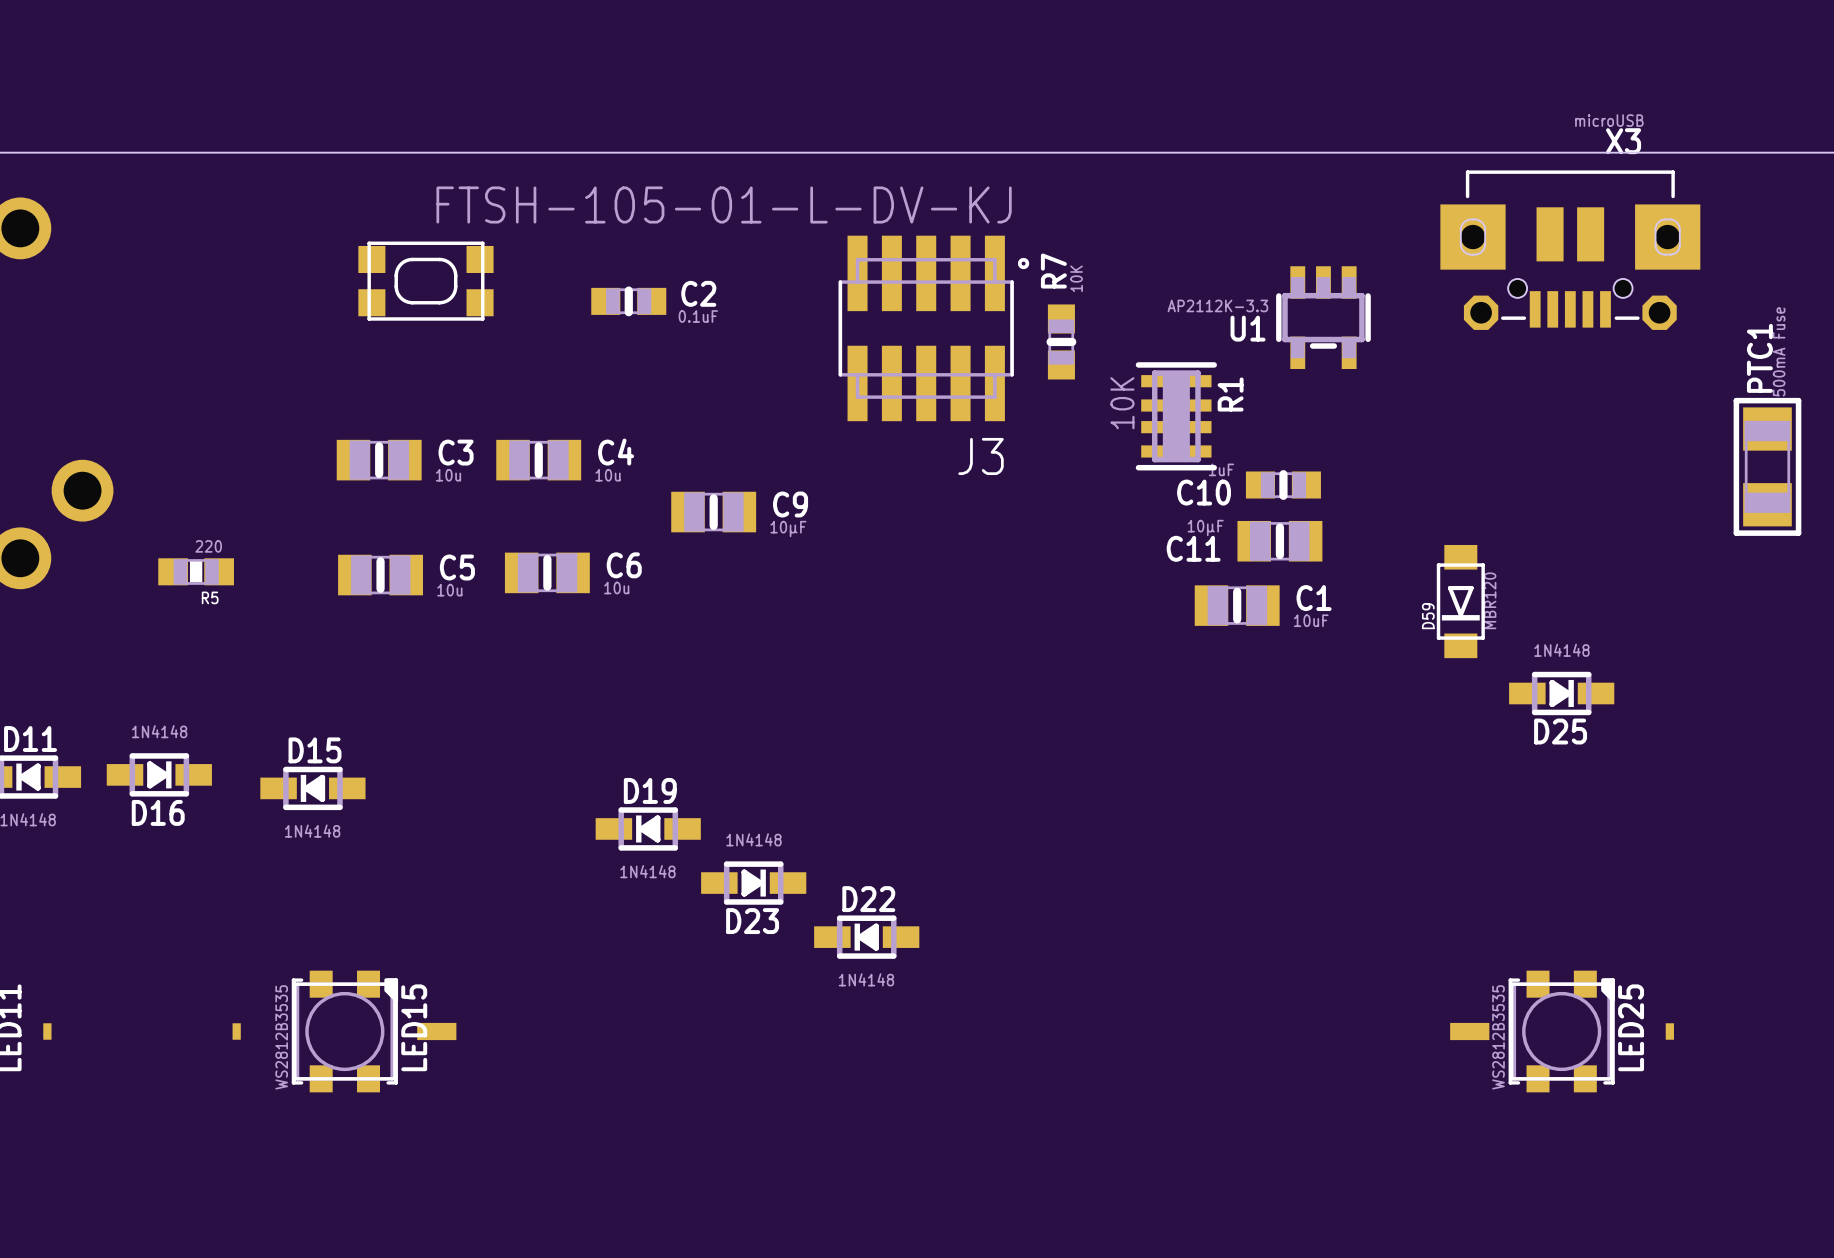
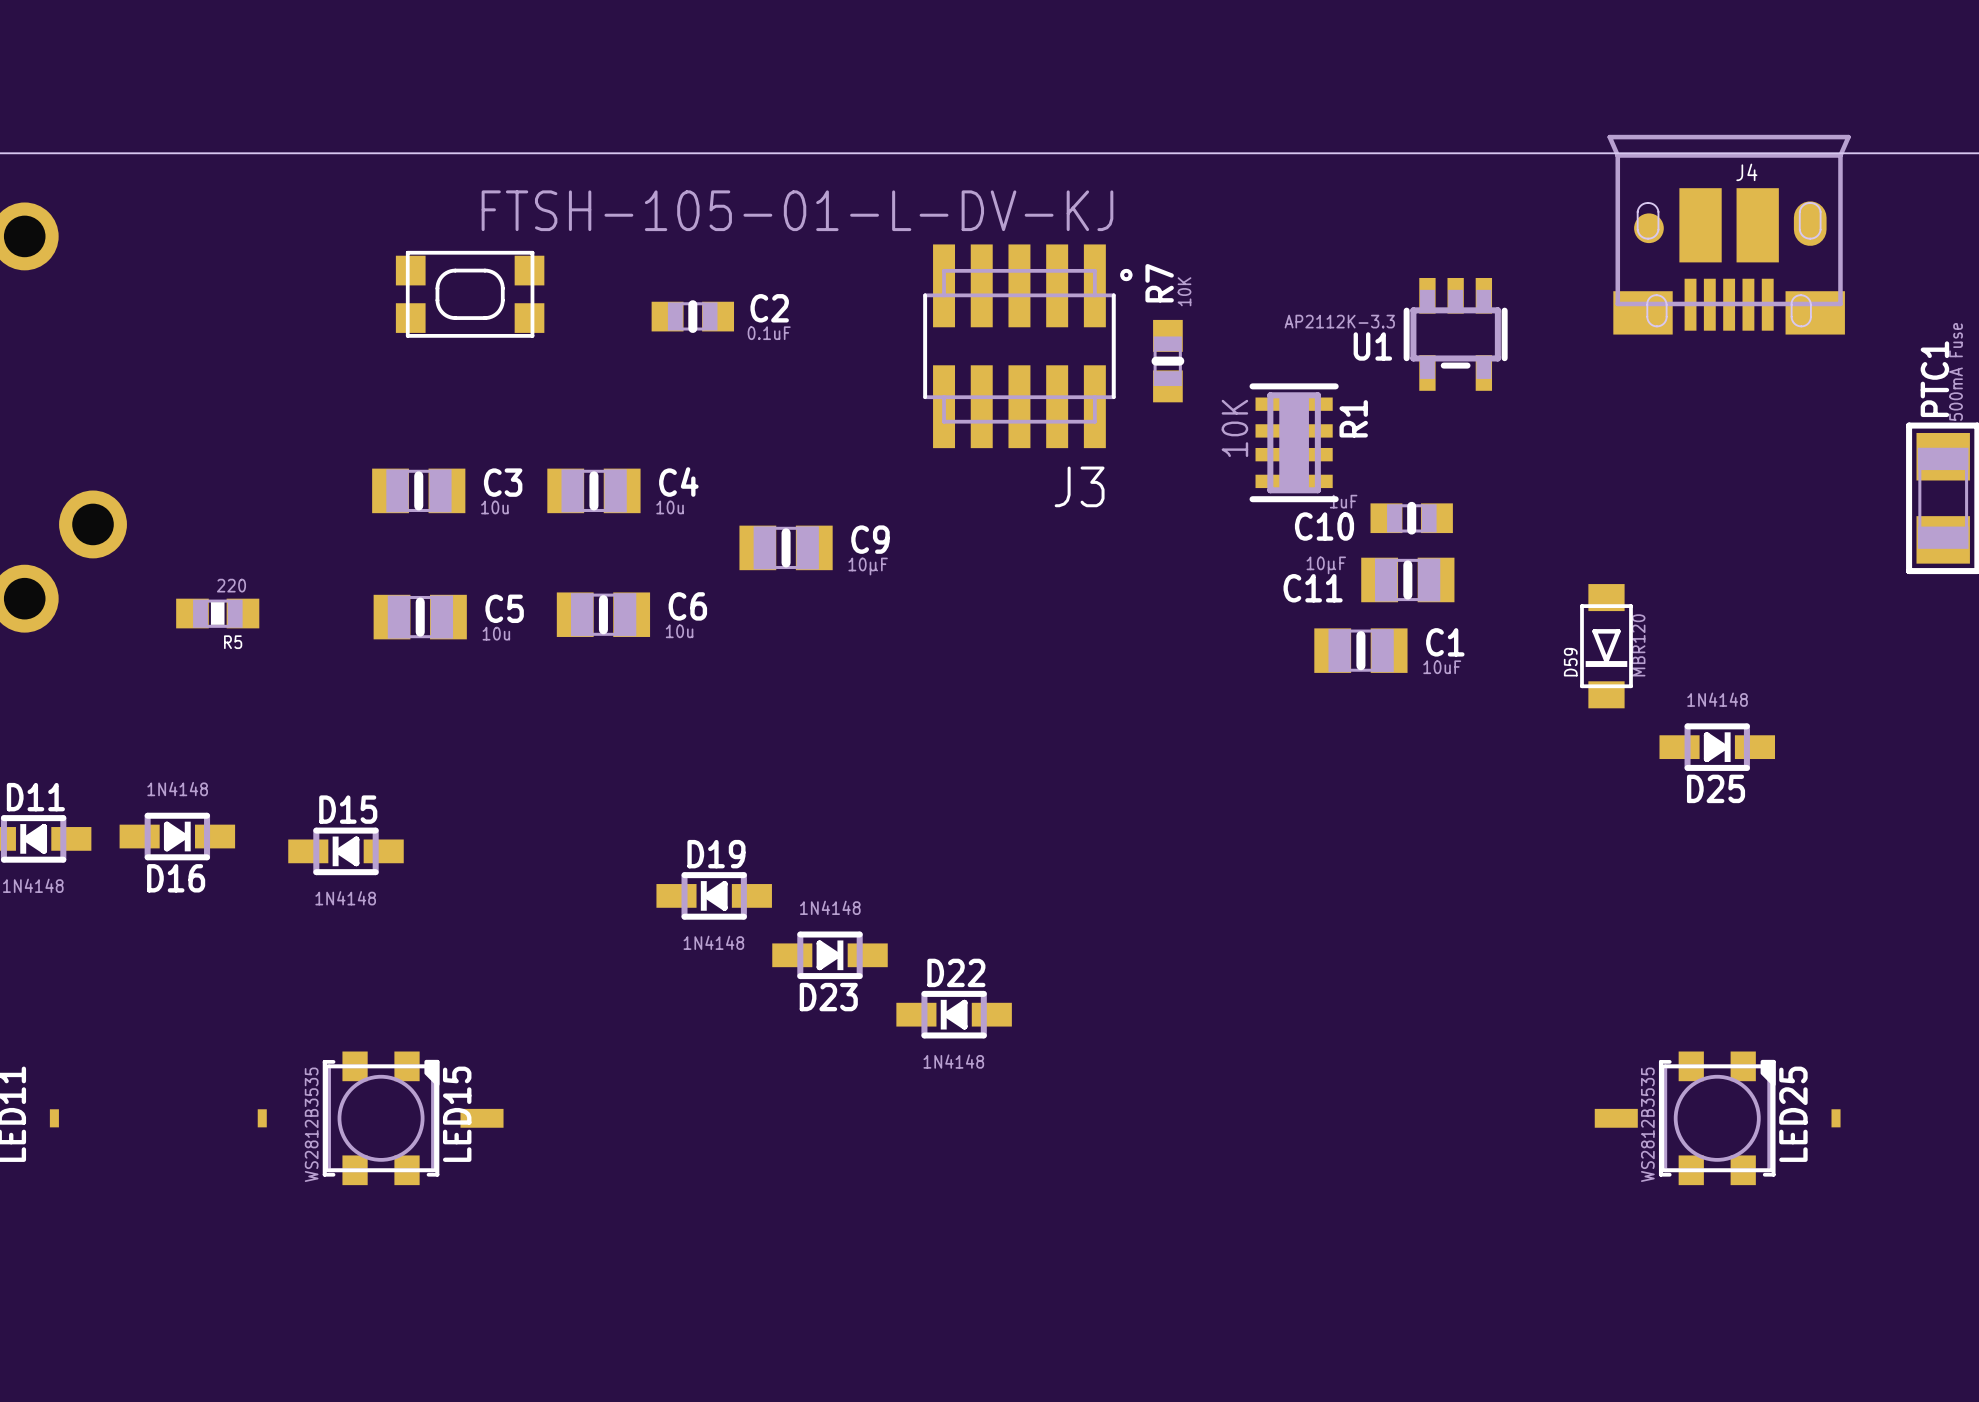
J4: none -> (1729, 234)
X3: microUSB (1570, 250) -> none

